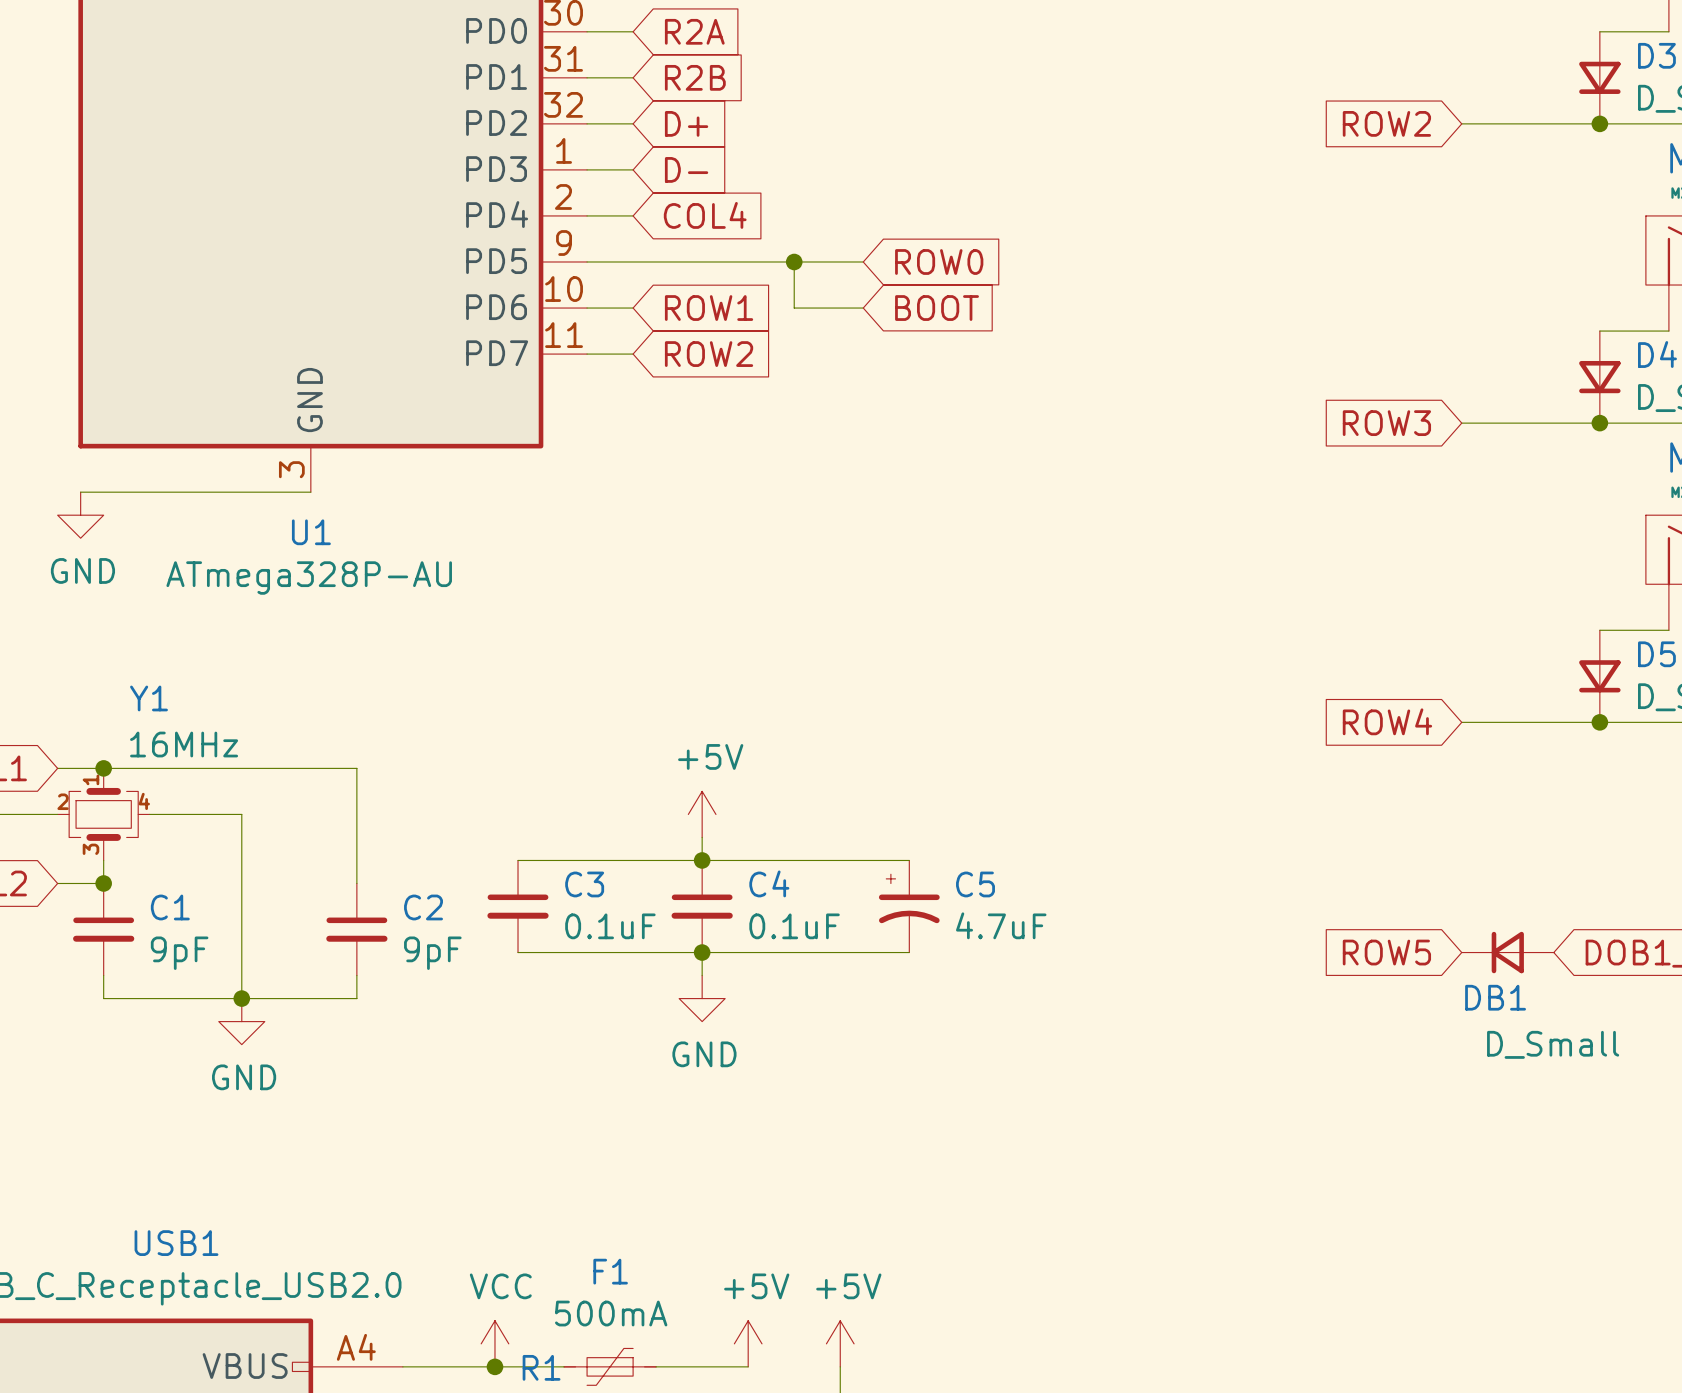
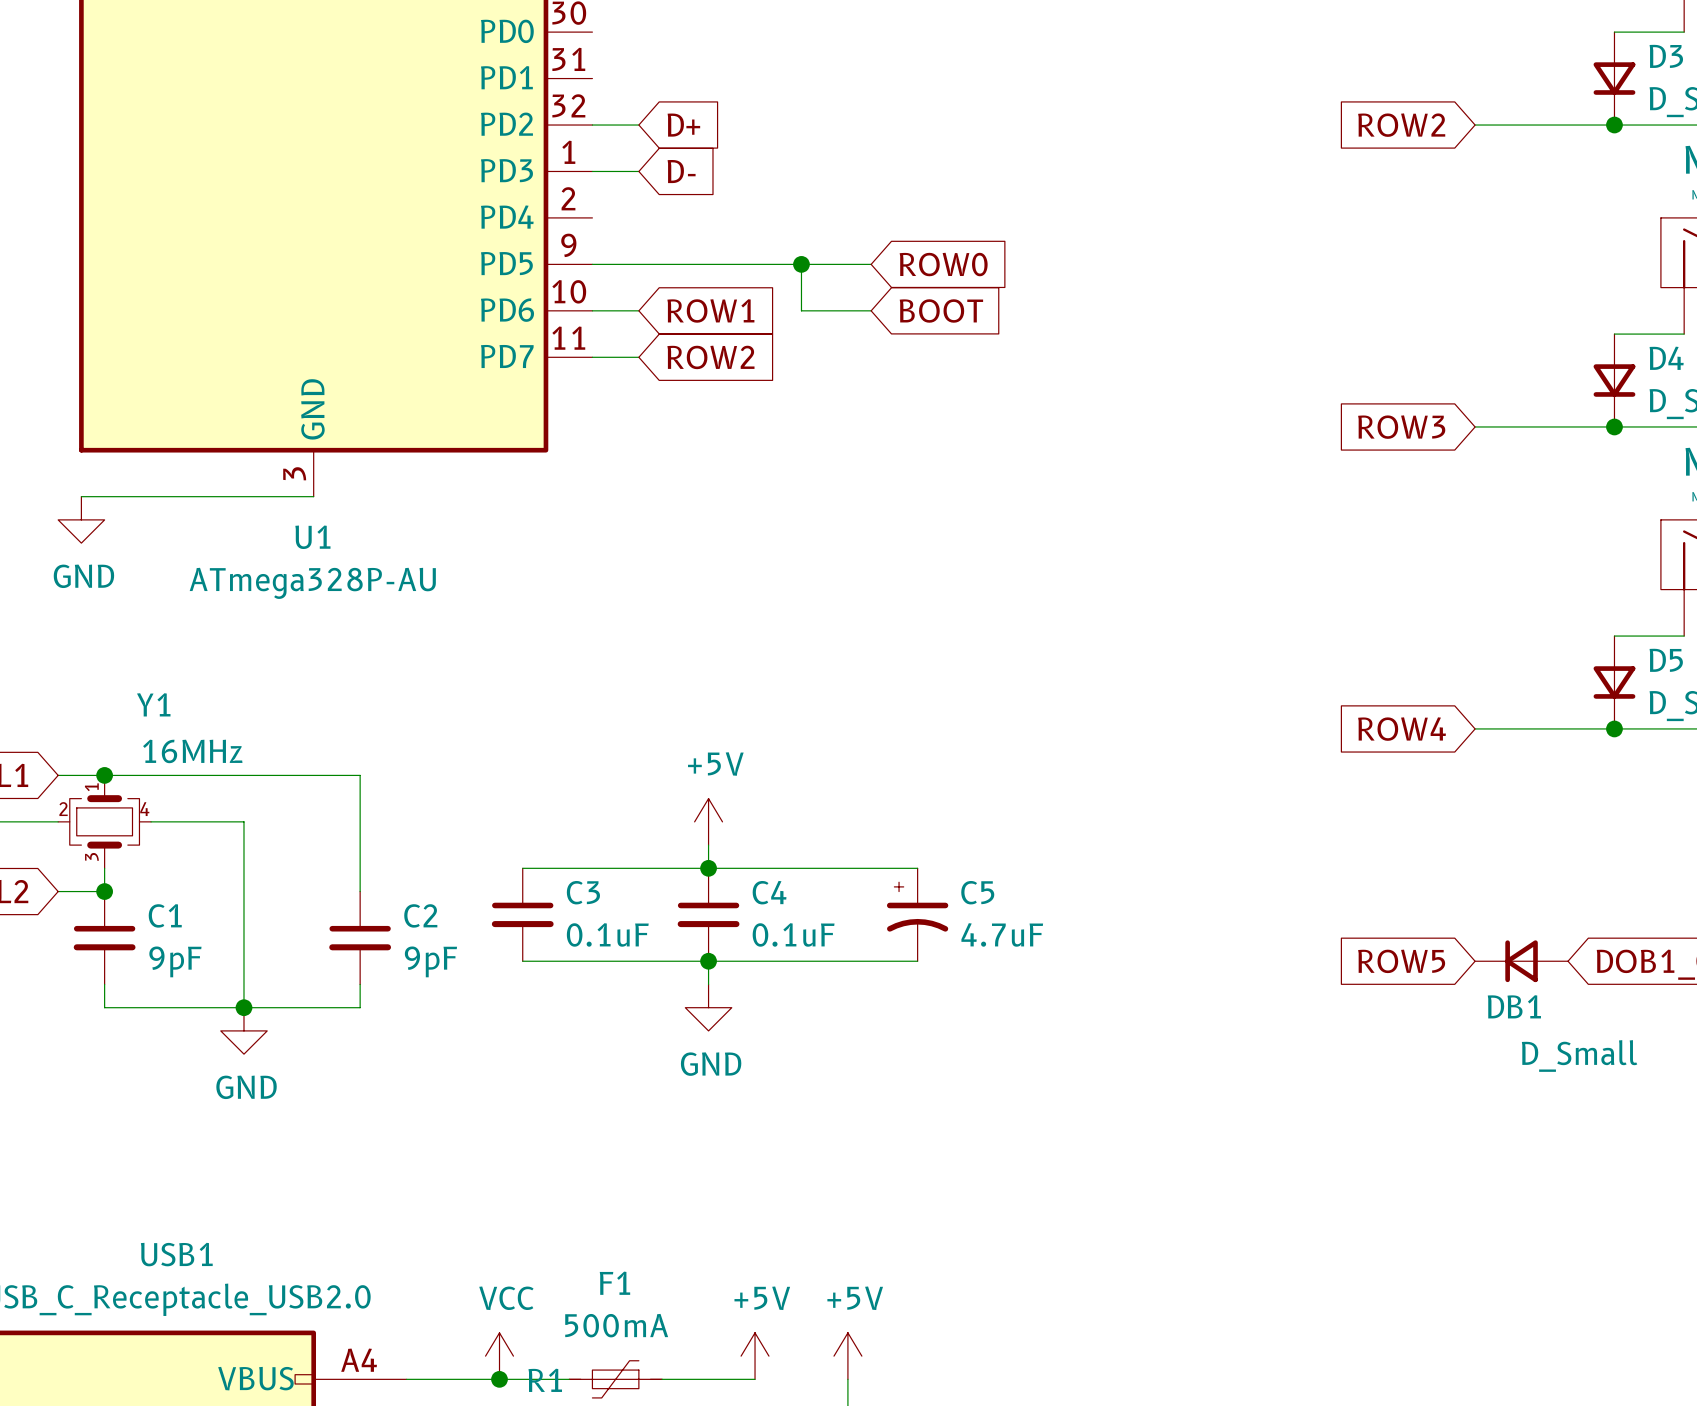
wire: (587, 31) (633, 31) -> none
global label: R2A (694, 31) -> none
wire: (587, 77) (633, 77) -> none
global label: R2B (695, 77) -> none
wire: (587, 215) (633, 215) -> none
global label: COL4 (705, 215) -> none

